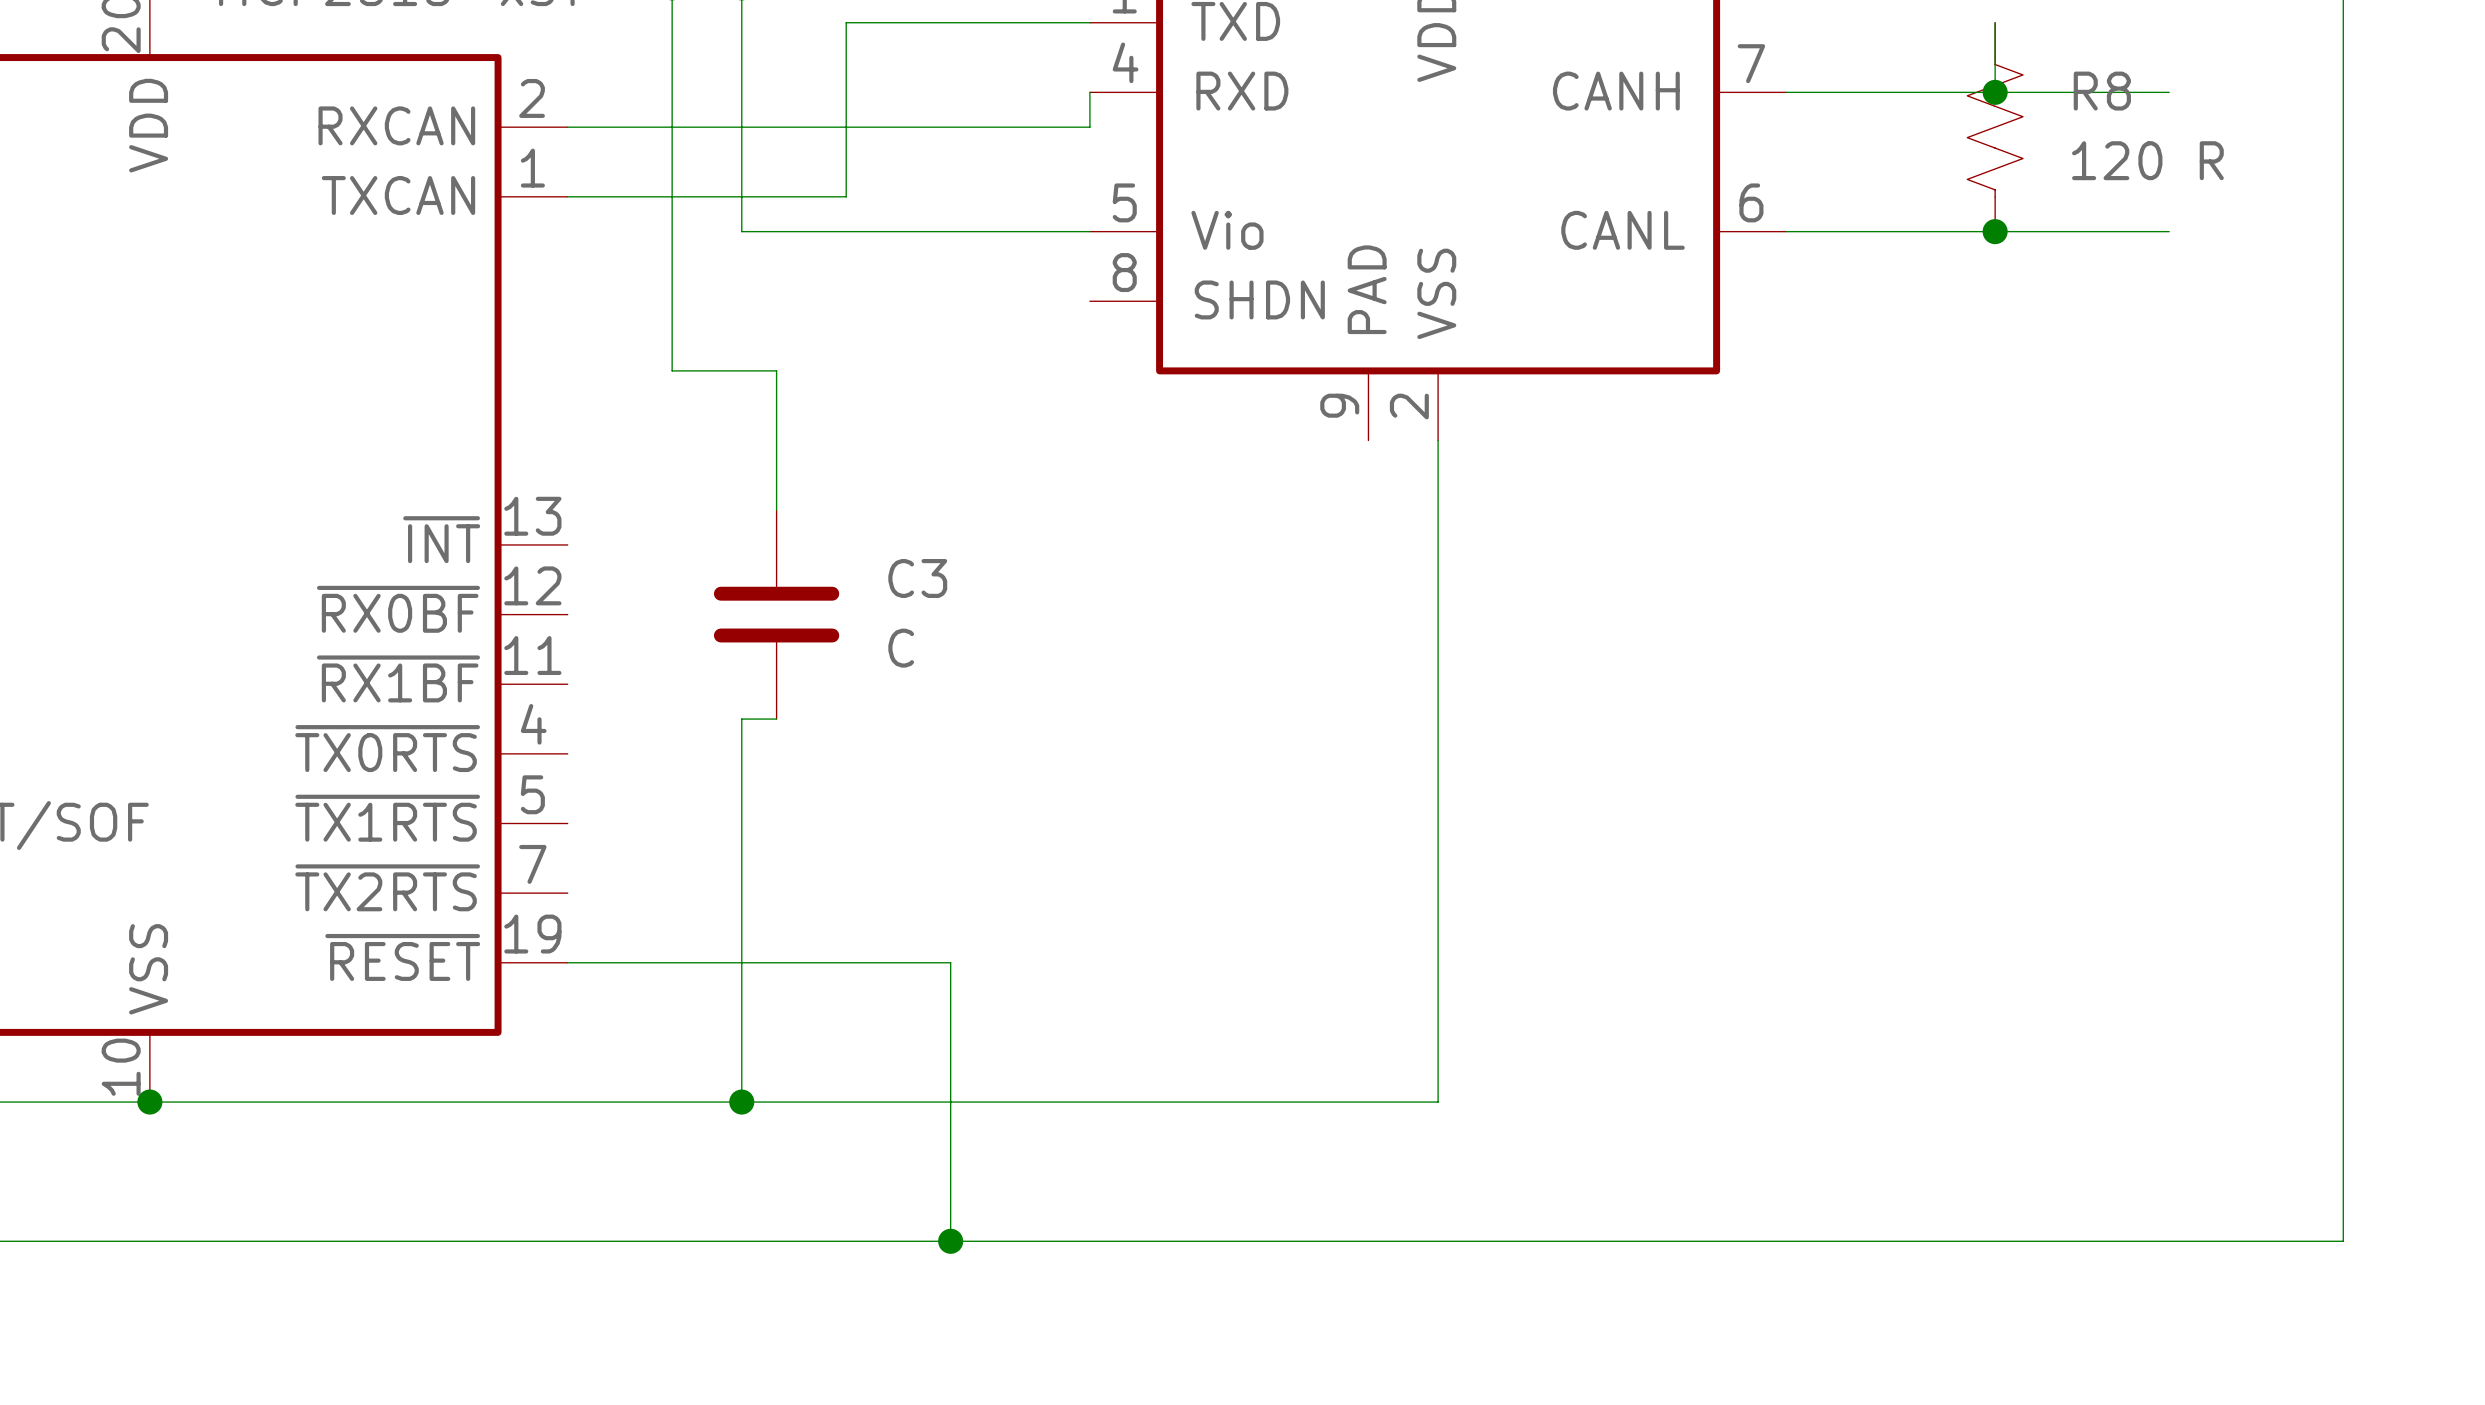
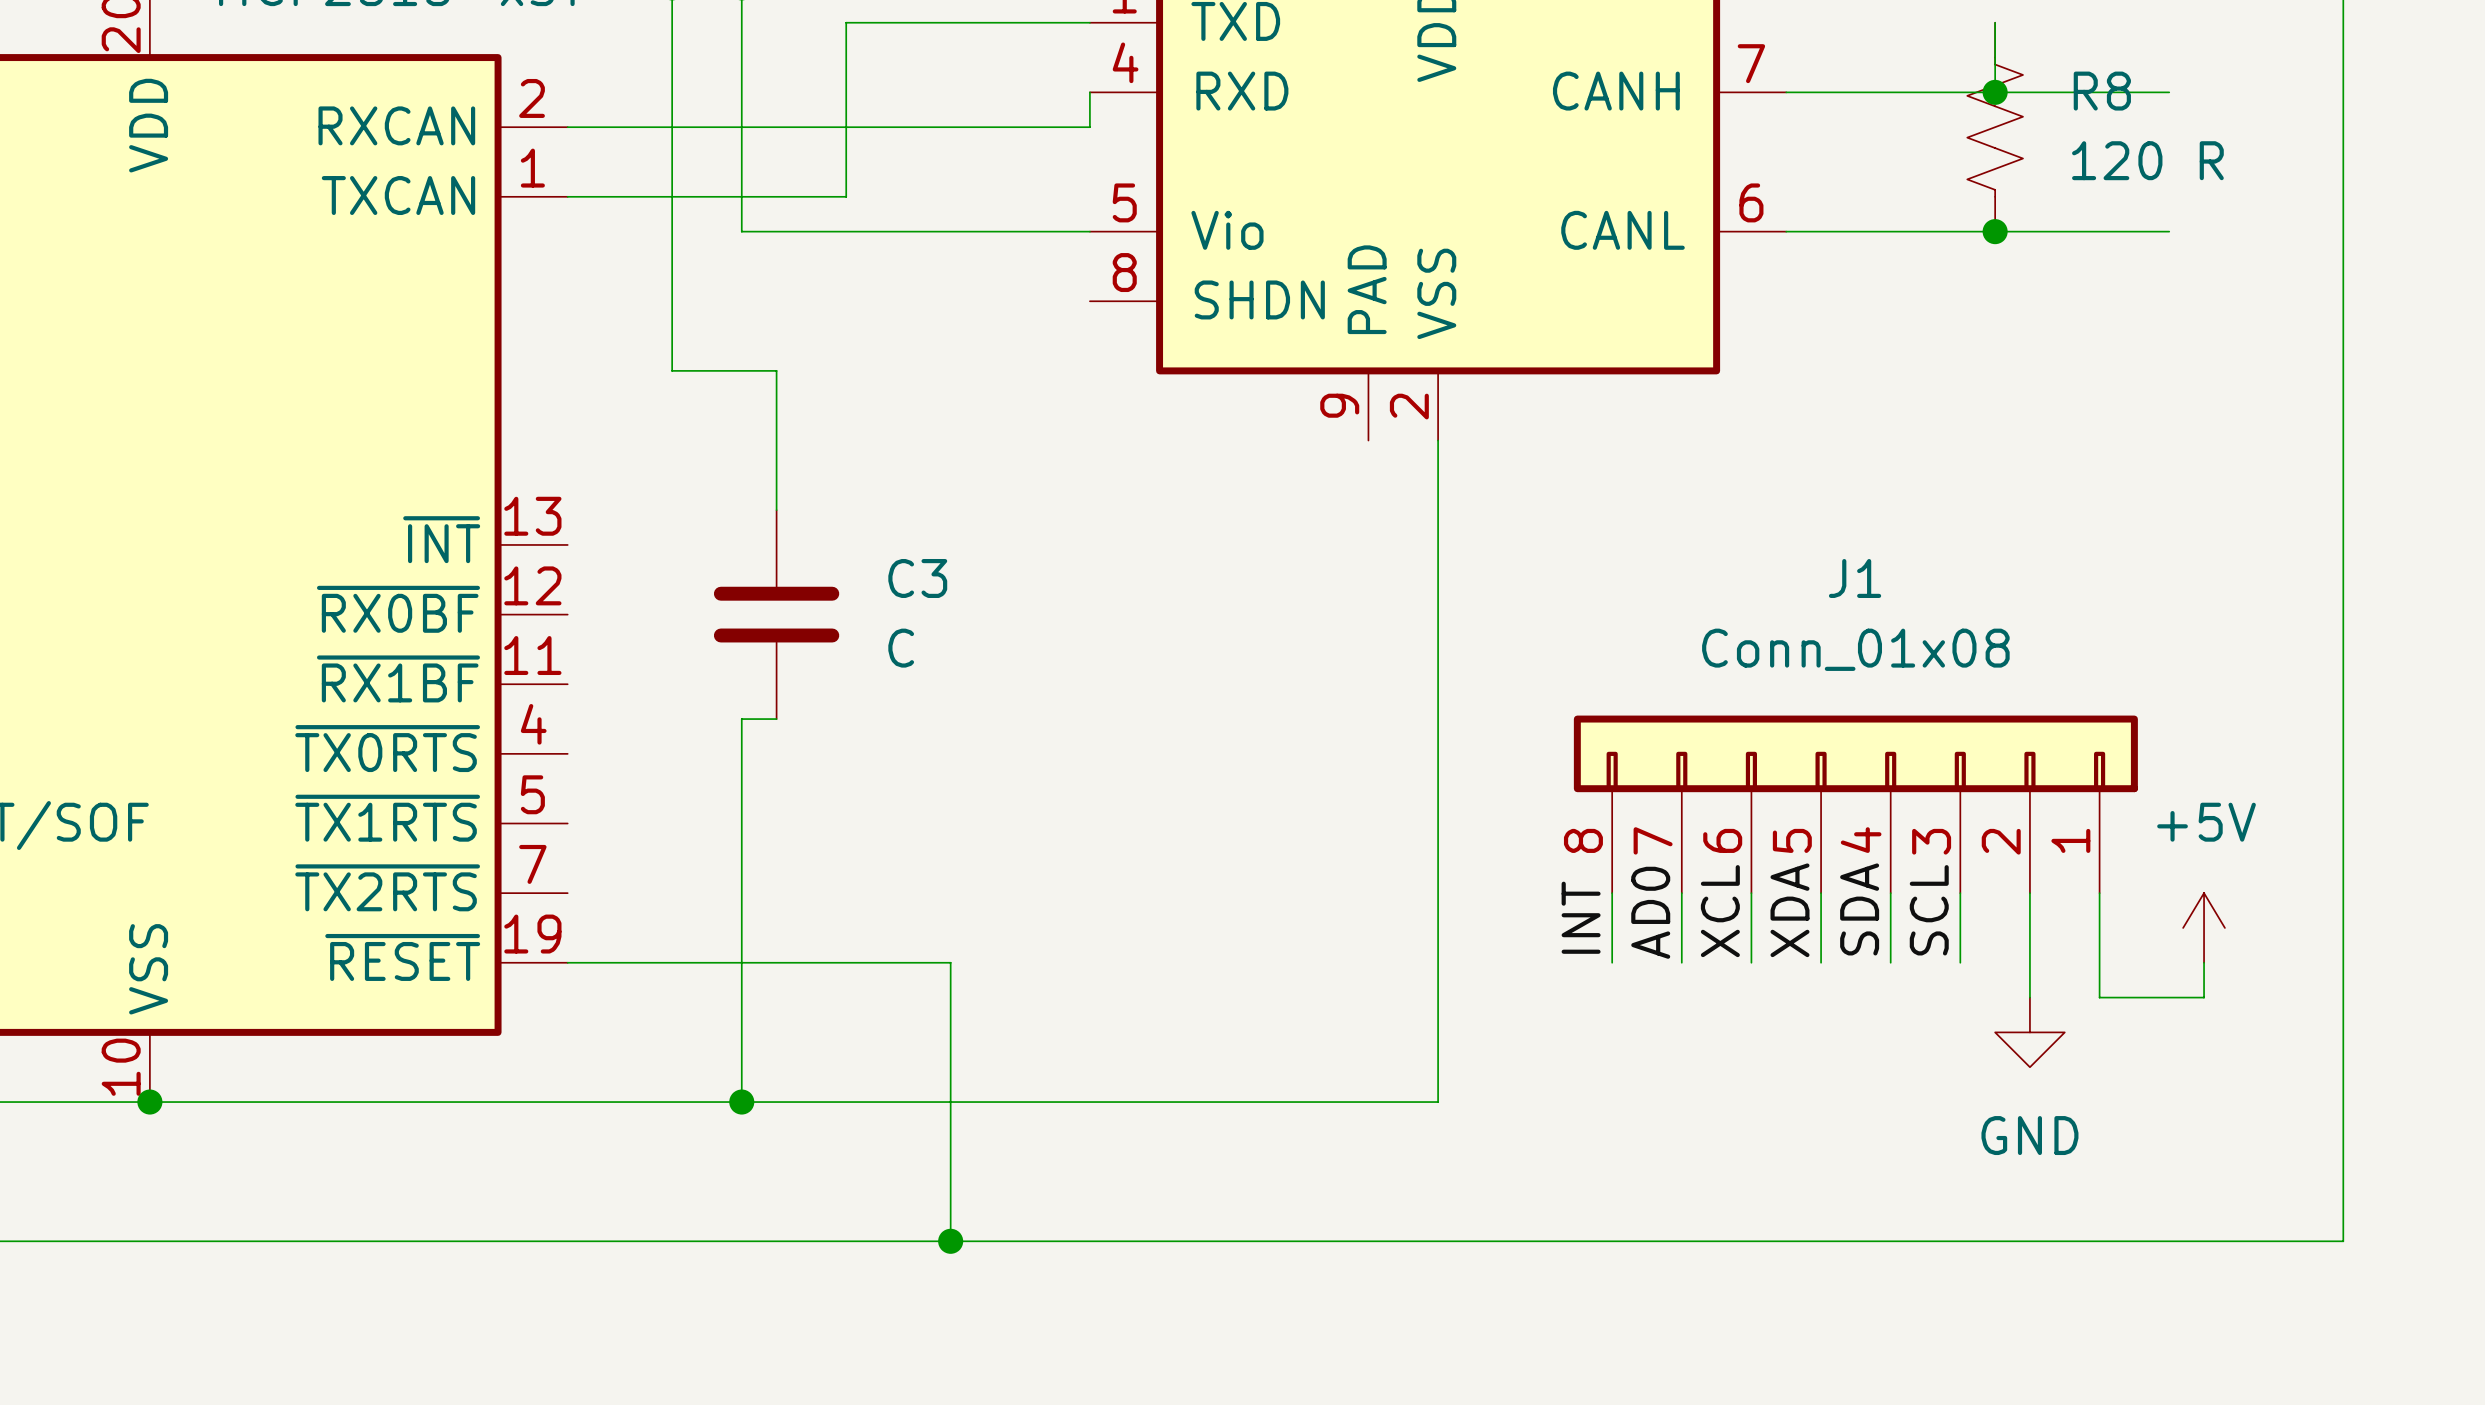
J1: none -> Conn_01x08 (1855, 804)
wire: none -> (1612, 893) (1612, 962)
wire: none -> (1681, 893) (1681, 962)
wire: none -> (1751, 893) (1751, 962)
wire: none -> (1821, 893) (1821, 962)
wire: none -> (1890, 893) (1890, 962)
wire: none -> (1960, 893) (1960, 962)
wire: none -> (2029, 893) (2029, 997)
wire: none -> (2099, 893) (2099, 997) (2204, 997) (2204, 962)
label: none -> SDA (1859, 909)
label: none -> XDA (1789, 910)
label: none -> SCL (1929, 910)
label: none -> XCL (1720, 911)
label: none -> AD0 (1650, 912)
label: none -> INT (1581, 917)
power symbol: none -> +5V (2204, 927)
power symbol: none -> GND (2029, 1032)

